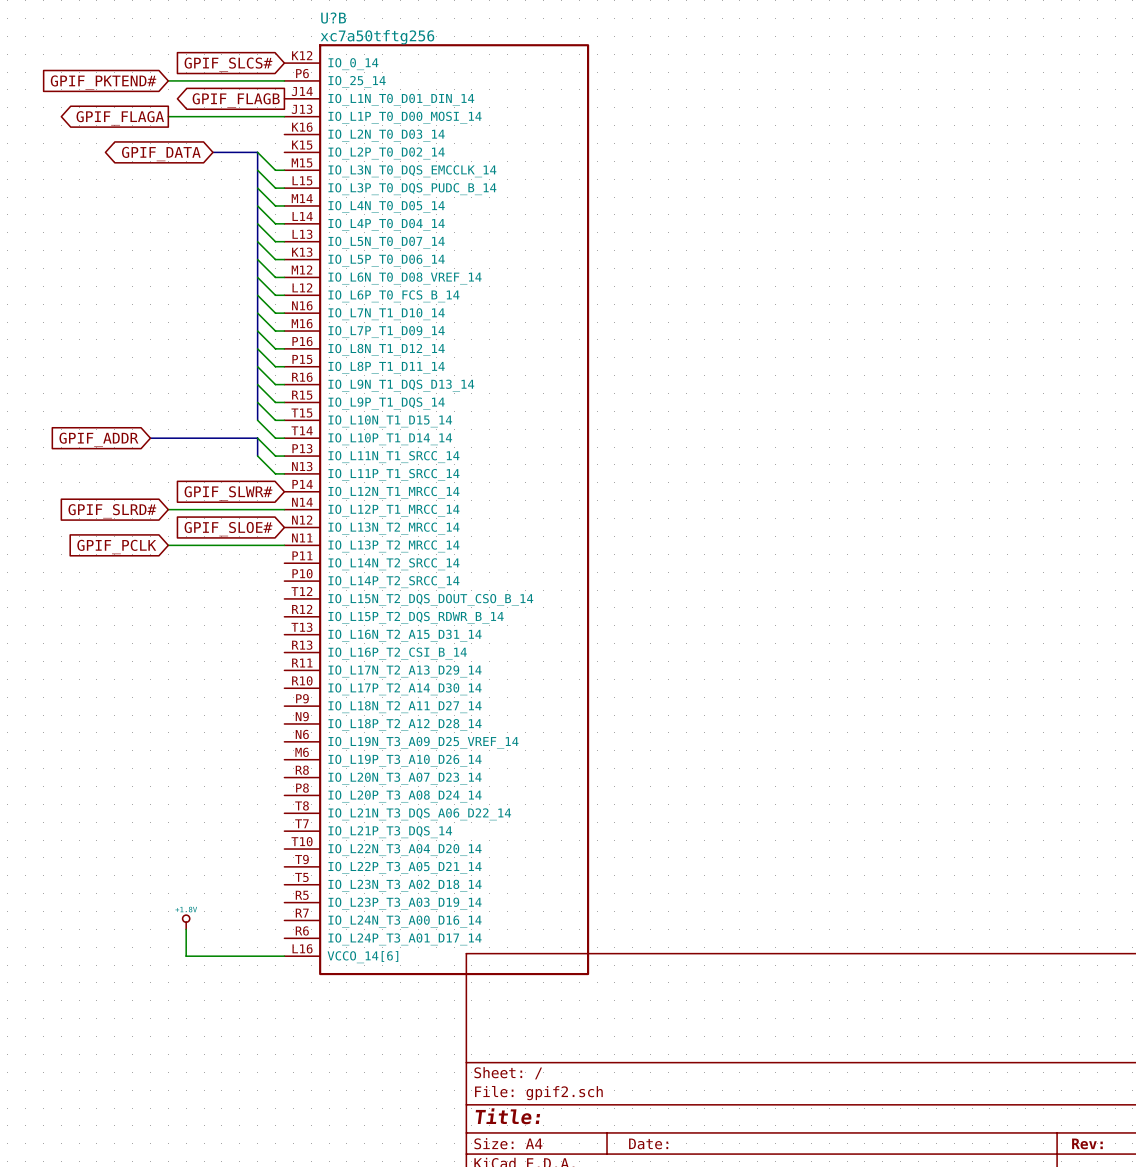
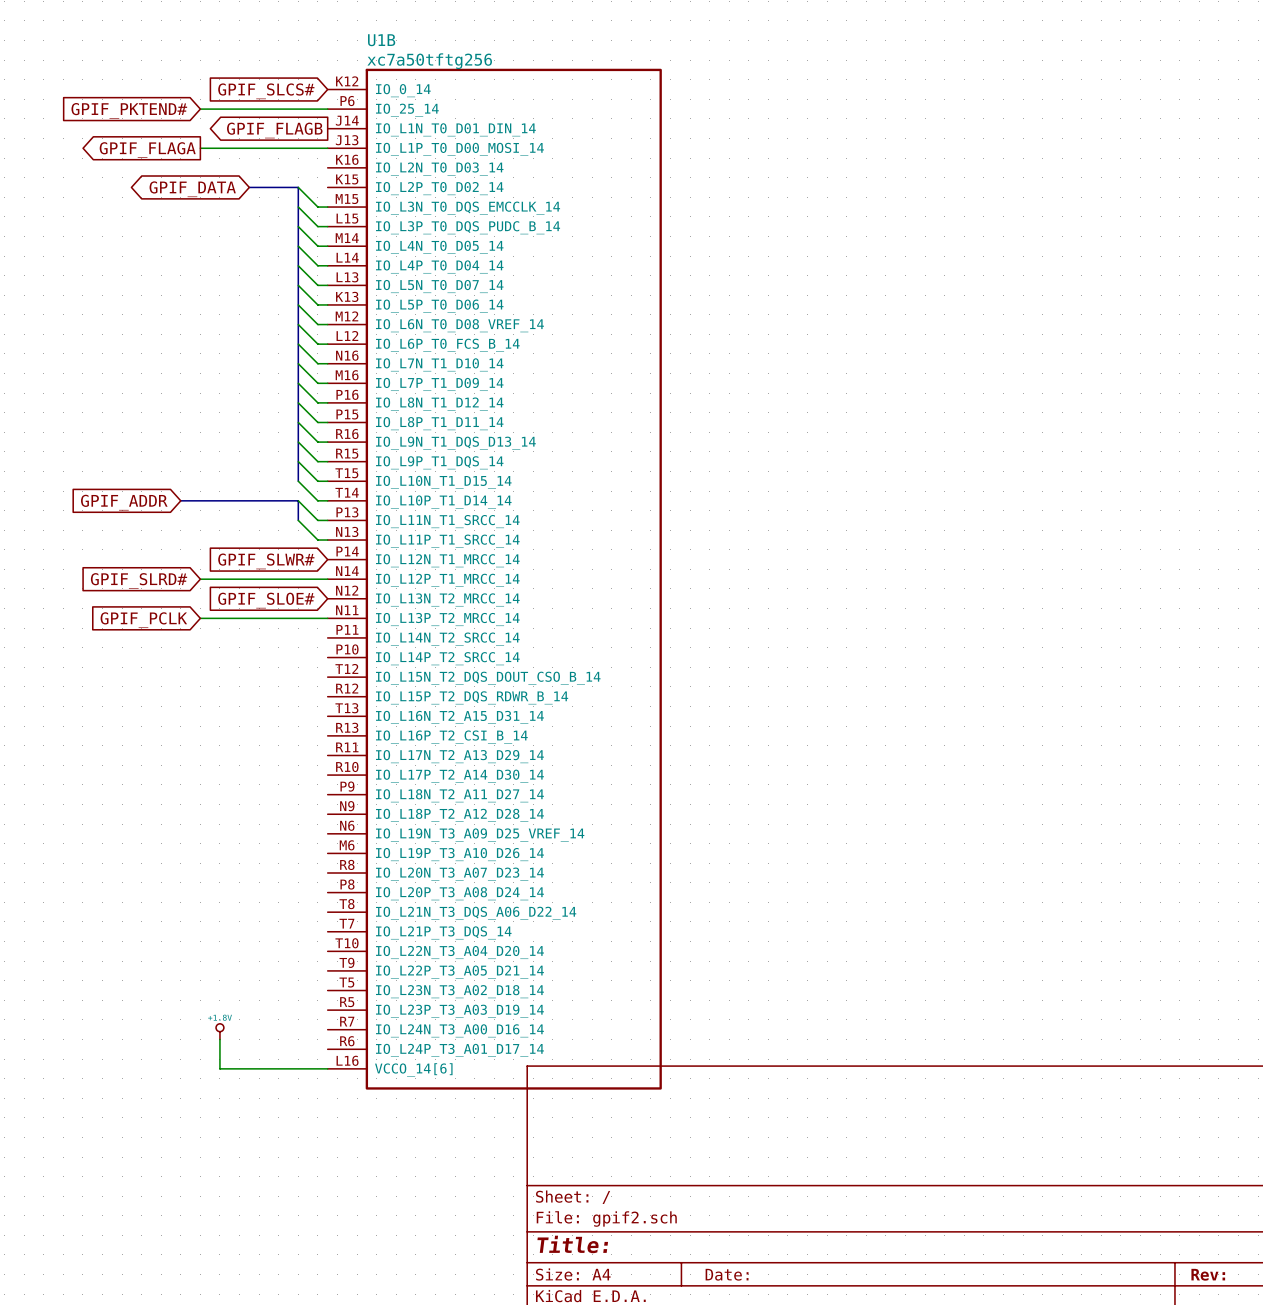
U?B name: U?B (333, 18) -> U1B (381, 40)

